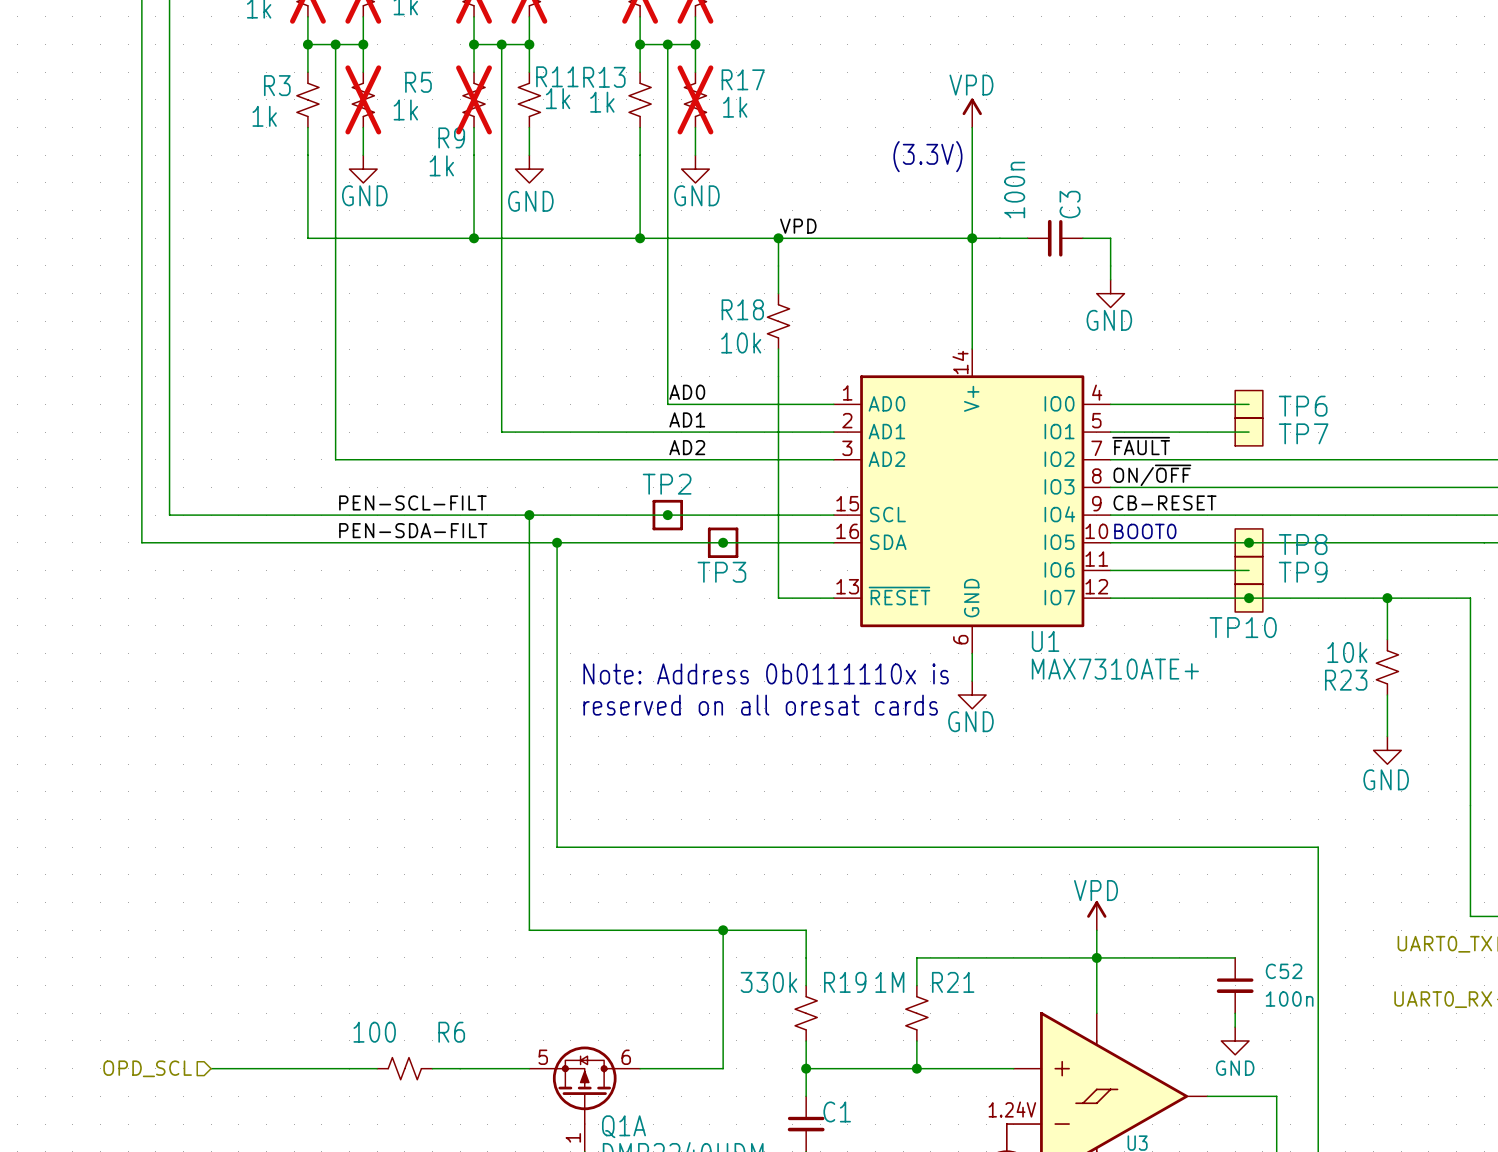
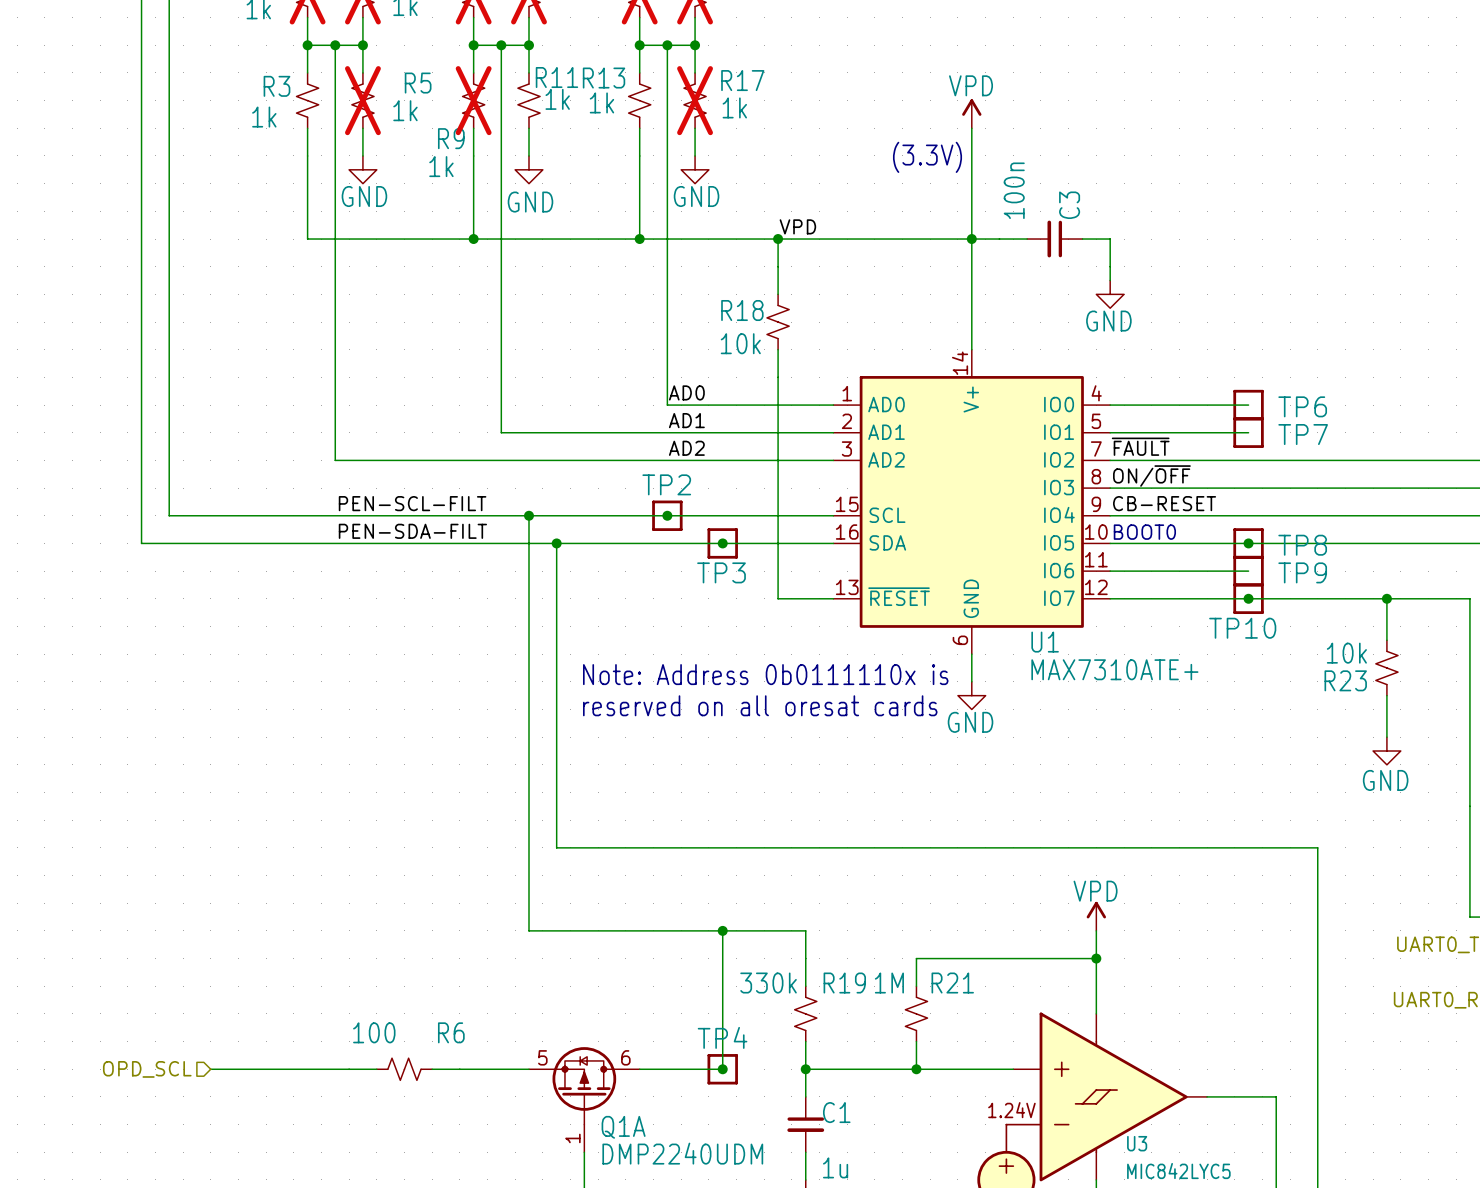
TP6 symbol: [1235, 390, 1263, 419] -> [1233, 389, 1264, 421]
TP7 symbol: [1235, 418, 1263, 446] -> [1233, 417, 1264, 448]
TP8 symbol: [1235, 528, 1263, 557] -> [1233, 528, 1264, 559]
TP9 symbol: [1235, 556, 1263, 585] -> [1233, 555, 1264, 587]
TP10 symbol: [1235, 584, 1263, 612] -> [1233, 583, 1264, 615]
wire: (1096, 957) (1235, 957) -> none
C52: 100n (1235, 985) -> none
wire: (1235, 1013) (1235, 1027) -> none
power symbol: GND (1235, 1040) -> none
TP4: none -> (722, 1069)
junction: none -> (722, 1069)

